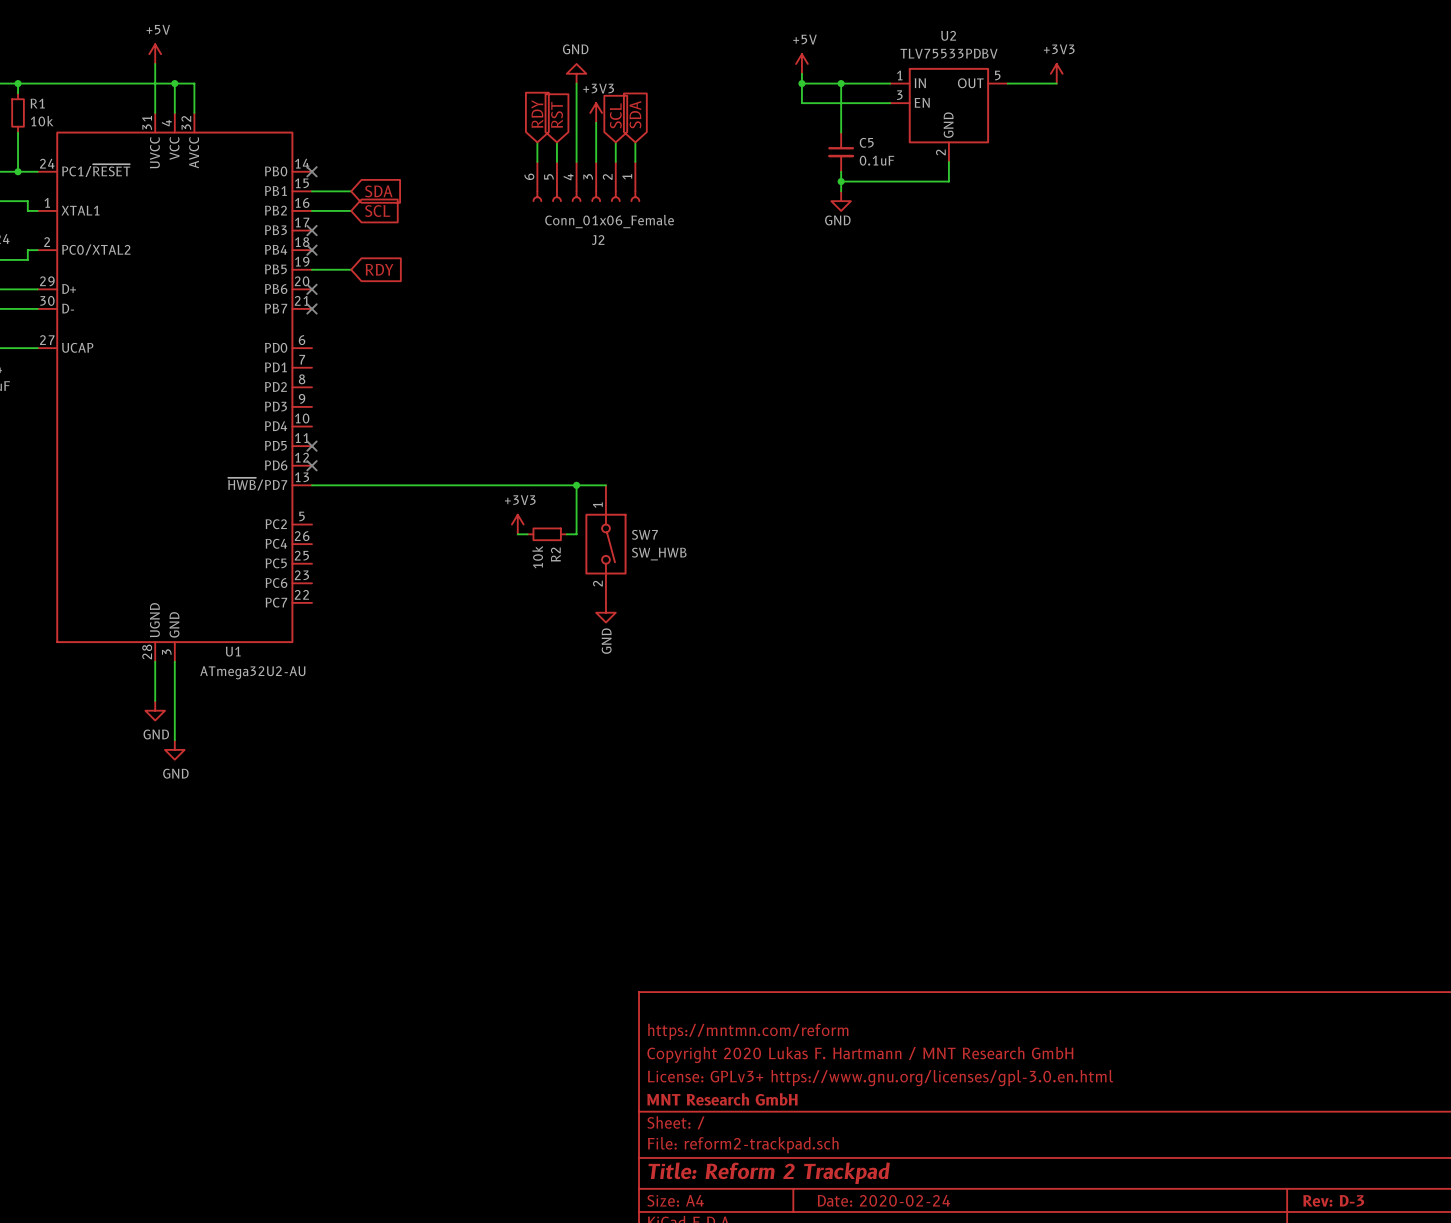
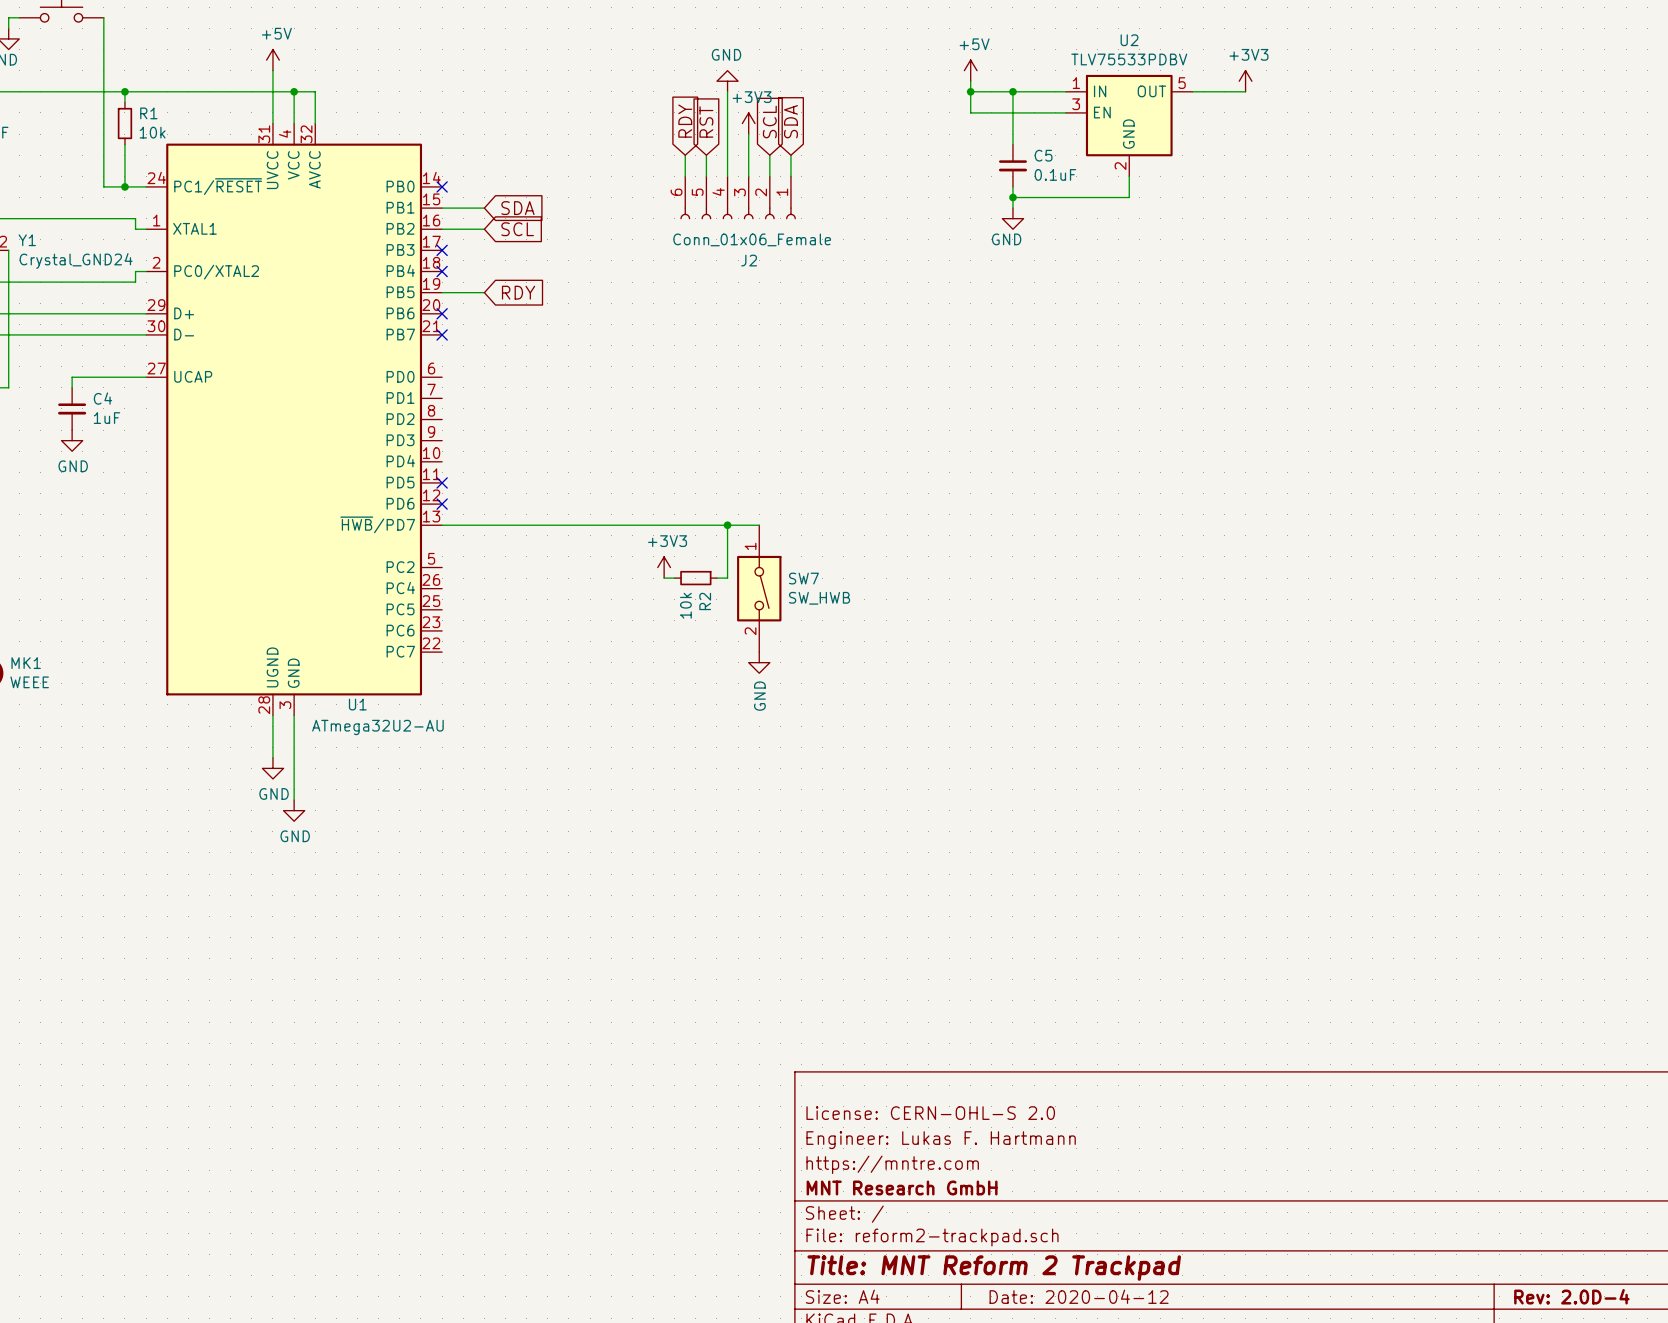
title block: https://mntmn.com/reform (748, 1031) -> License: CERN-OHL-S 2.0 (930, 1113)
title block: Copyright 2020 Lukas F. Hartmann / MNT Research GmbH (860, 1054) -> Engineer: Lukas F. Hartmann (941, 1140)
title block: License: GPLv3+ https://www.gnu.org/licenses/gpl-3.0.en.html (880, 1078) -> https://mntre.com (892, 1164)
title block: Title: Reform 2 Trackpad (769, 1173) -> Title: MNT Reform 2 Trackpad (994, 1268)
title block: Date: 2020-02-24 (883, 1200) -> Date: 2020-04-12 (1079, 1296)
title block: Rev: D-3 (1333, 1200) -> Rev: 2.0D-4 (1571, 1296)

